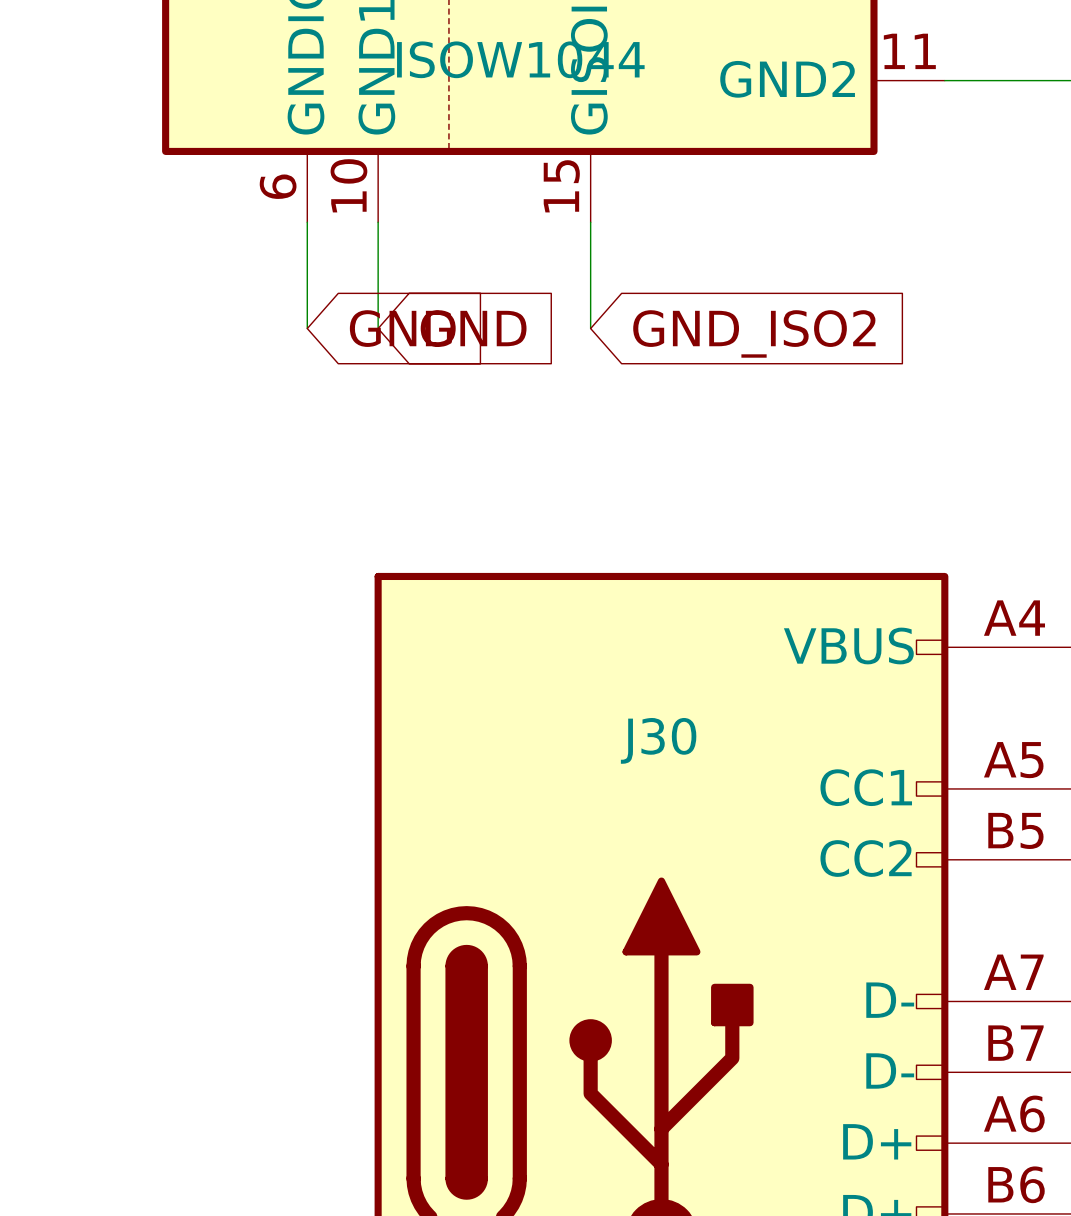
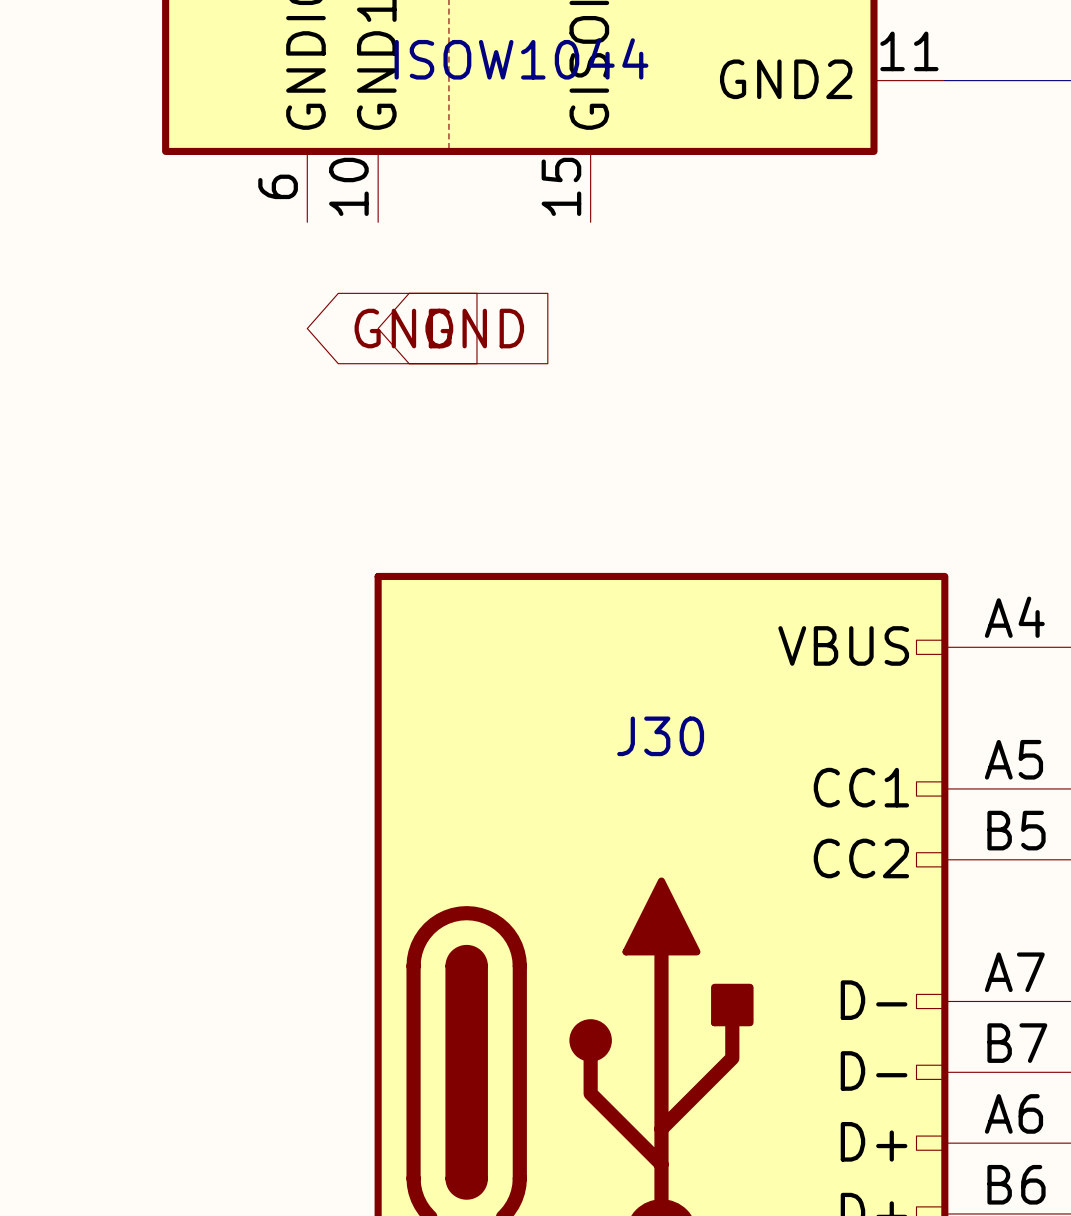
wire: (307, 222) (307, 328) -> none
wire: (378, 222) (378, 328) -> none
wire: (590, 222) (590, 328) -> none
global label: GND_ISO2 (754, 333) -> none

